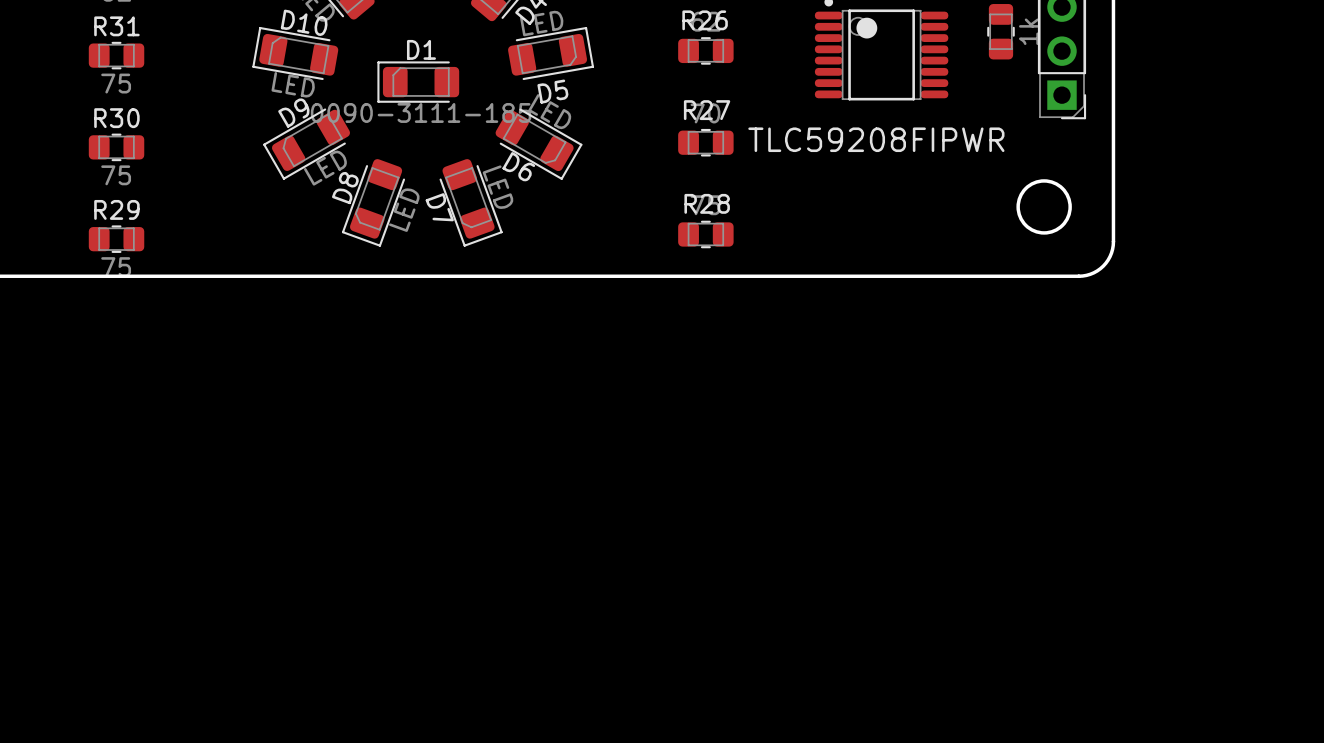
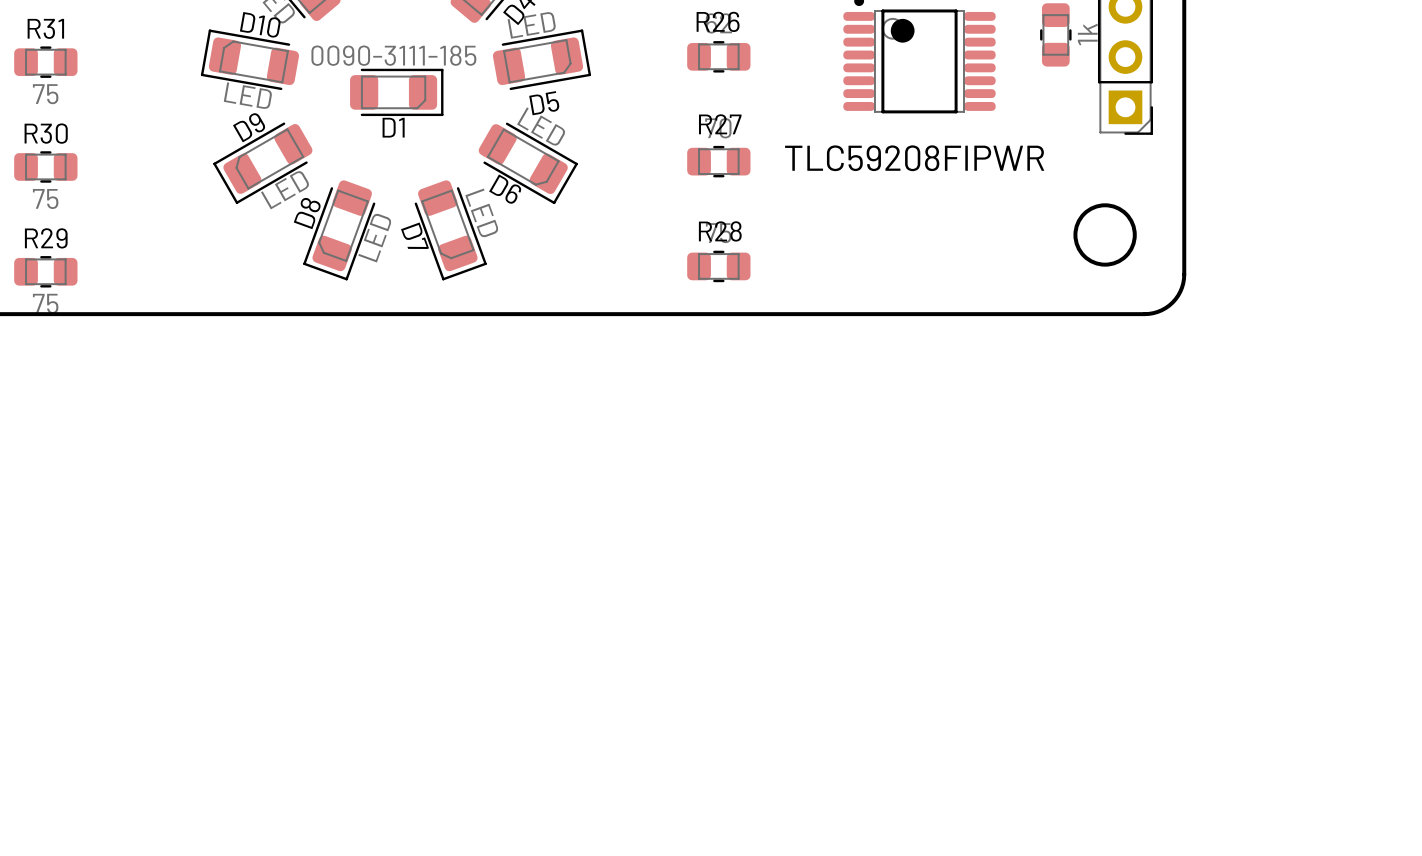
D1 rotation: 0° (418, 82) -> 180° (396, 92)

